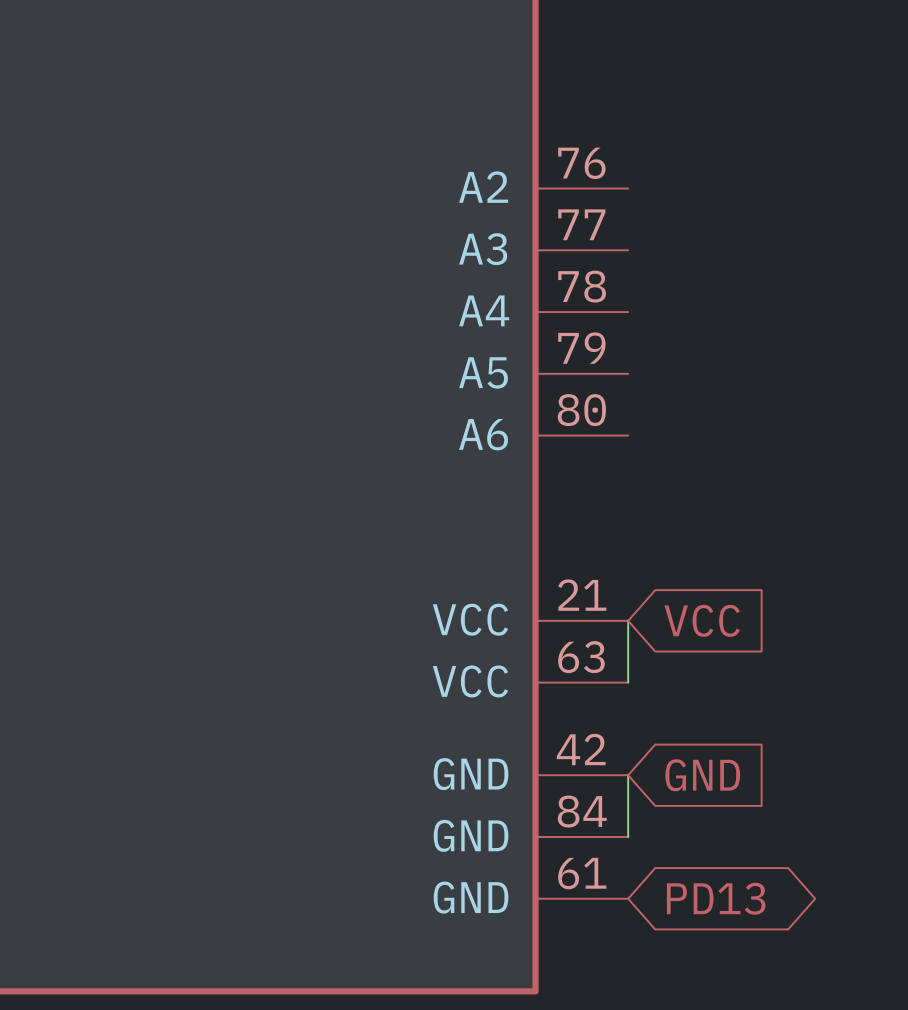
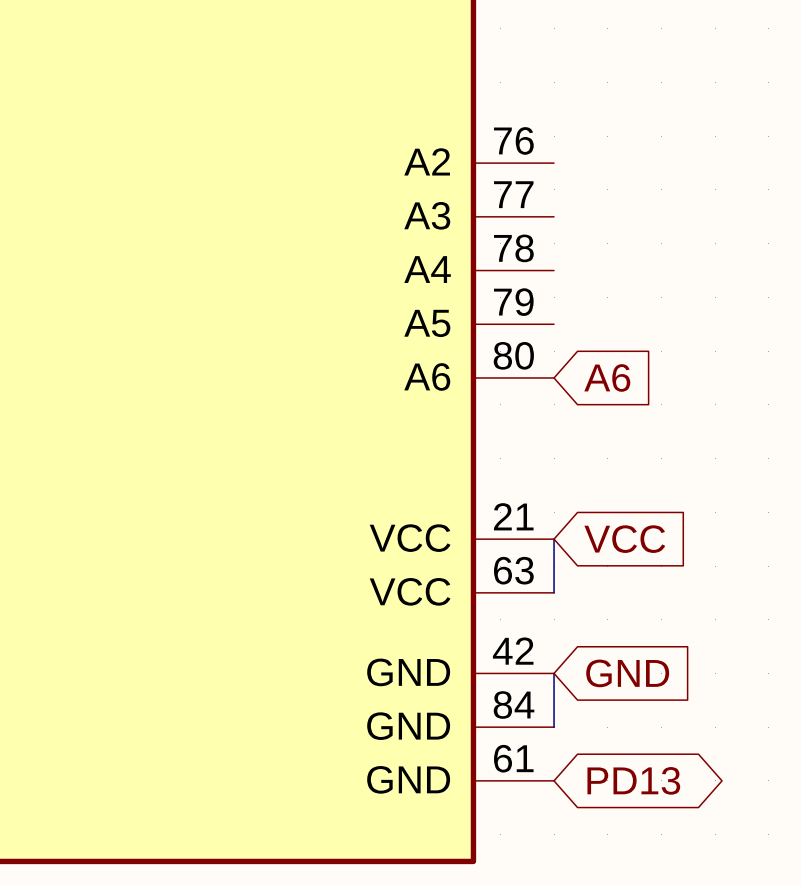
global label: none -> A6 (607, 377)

